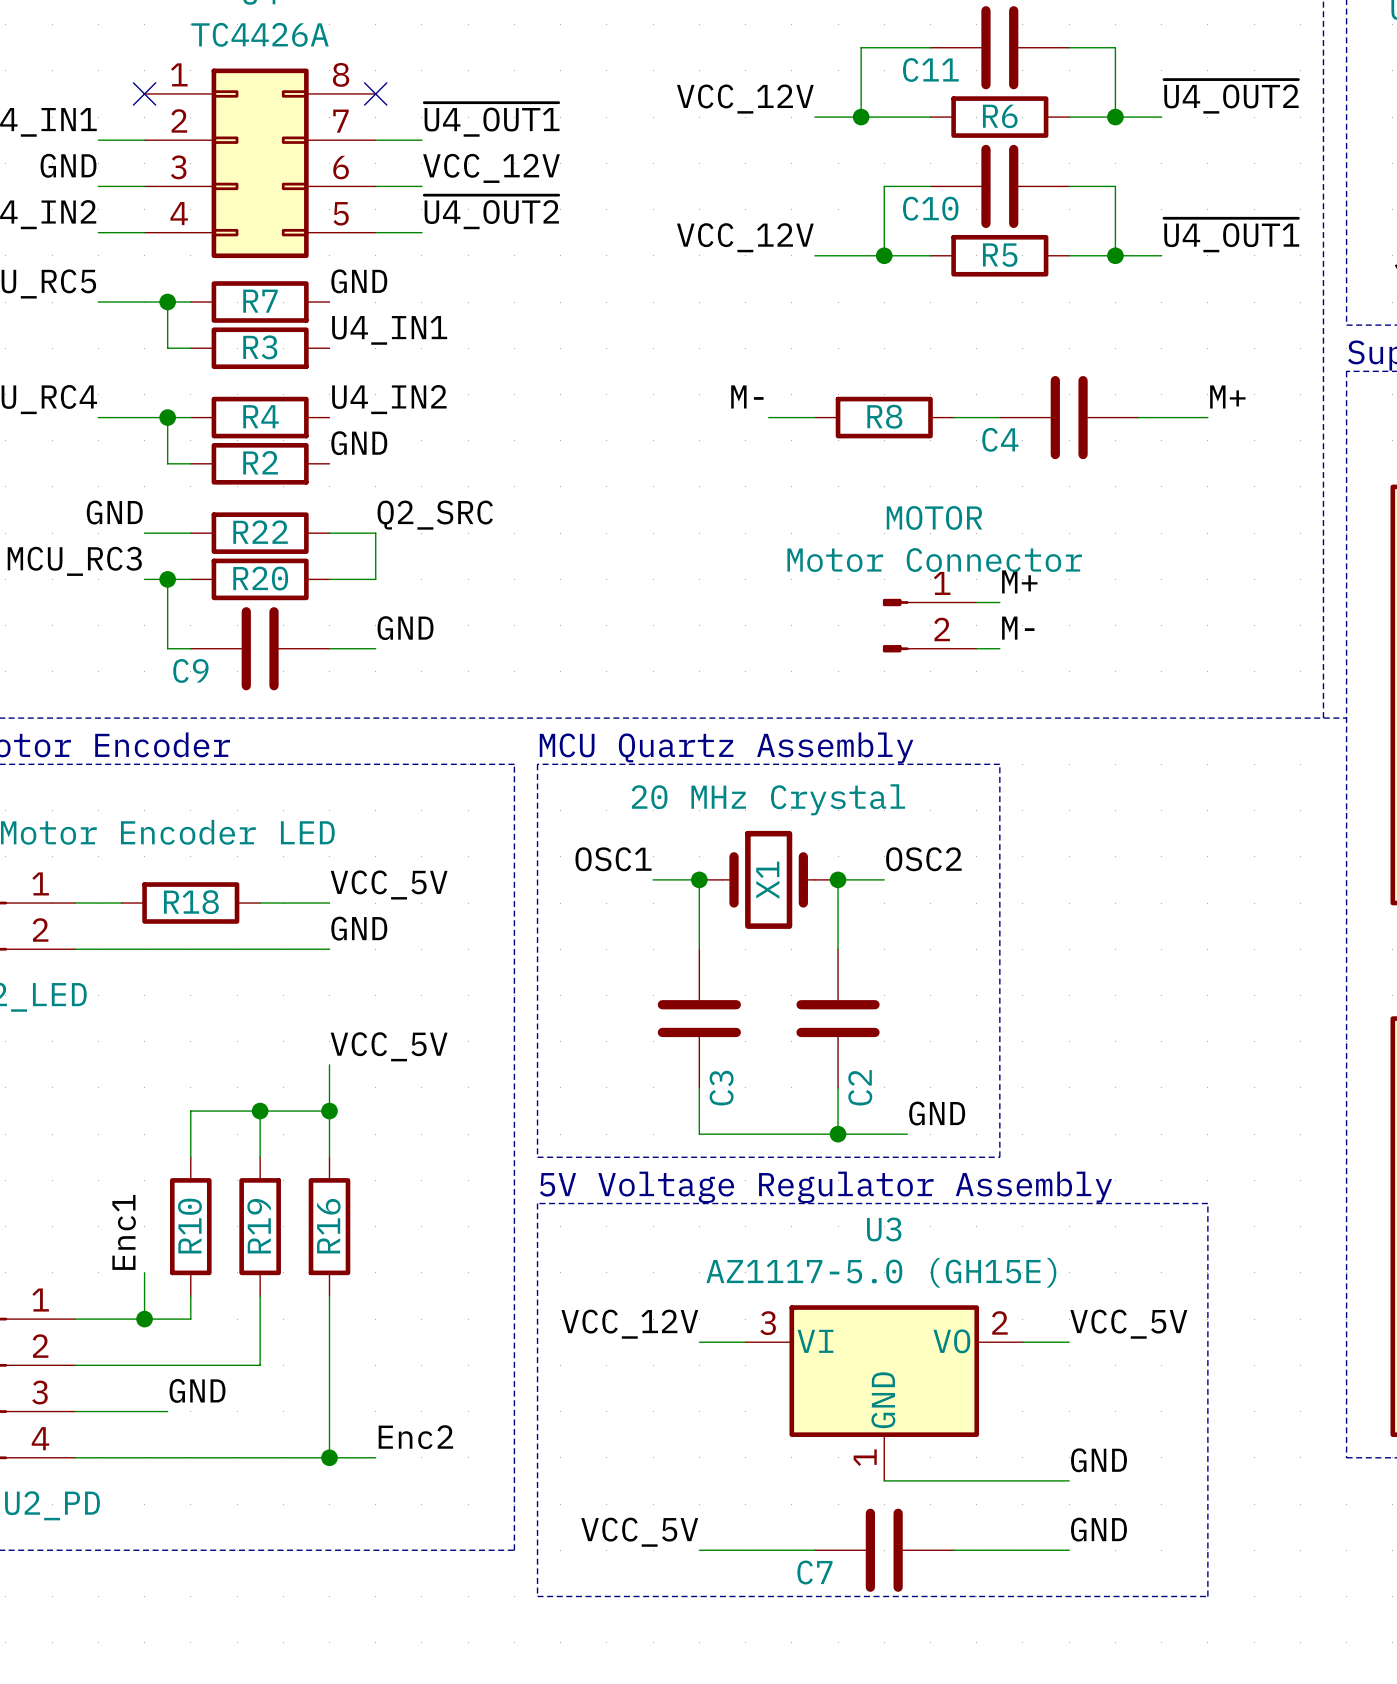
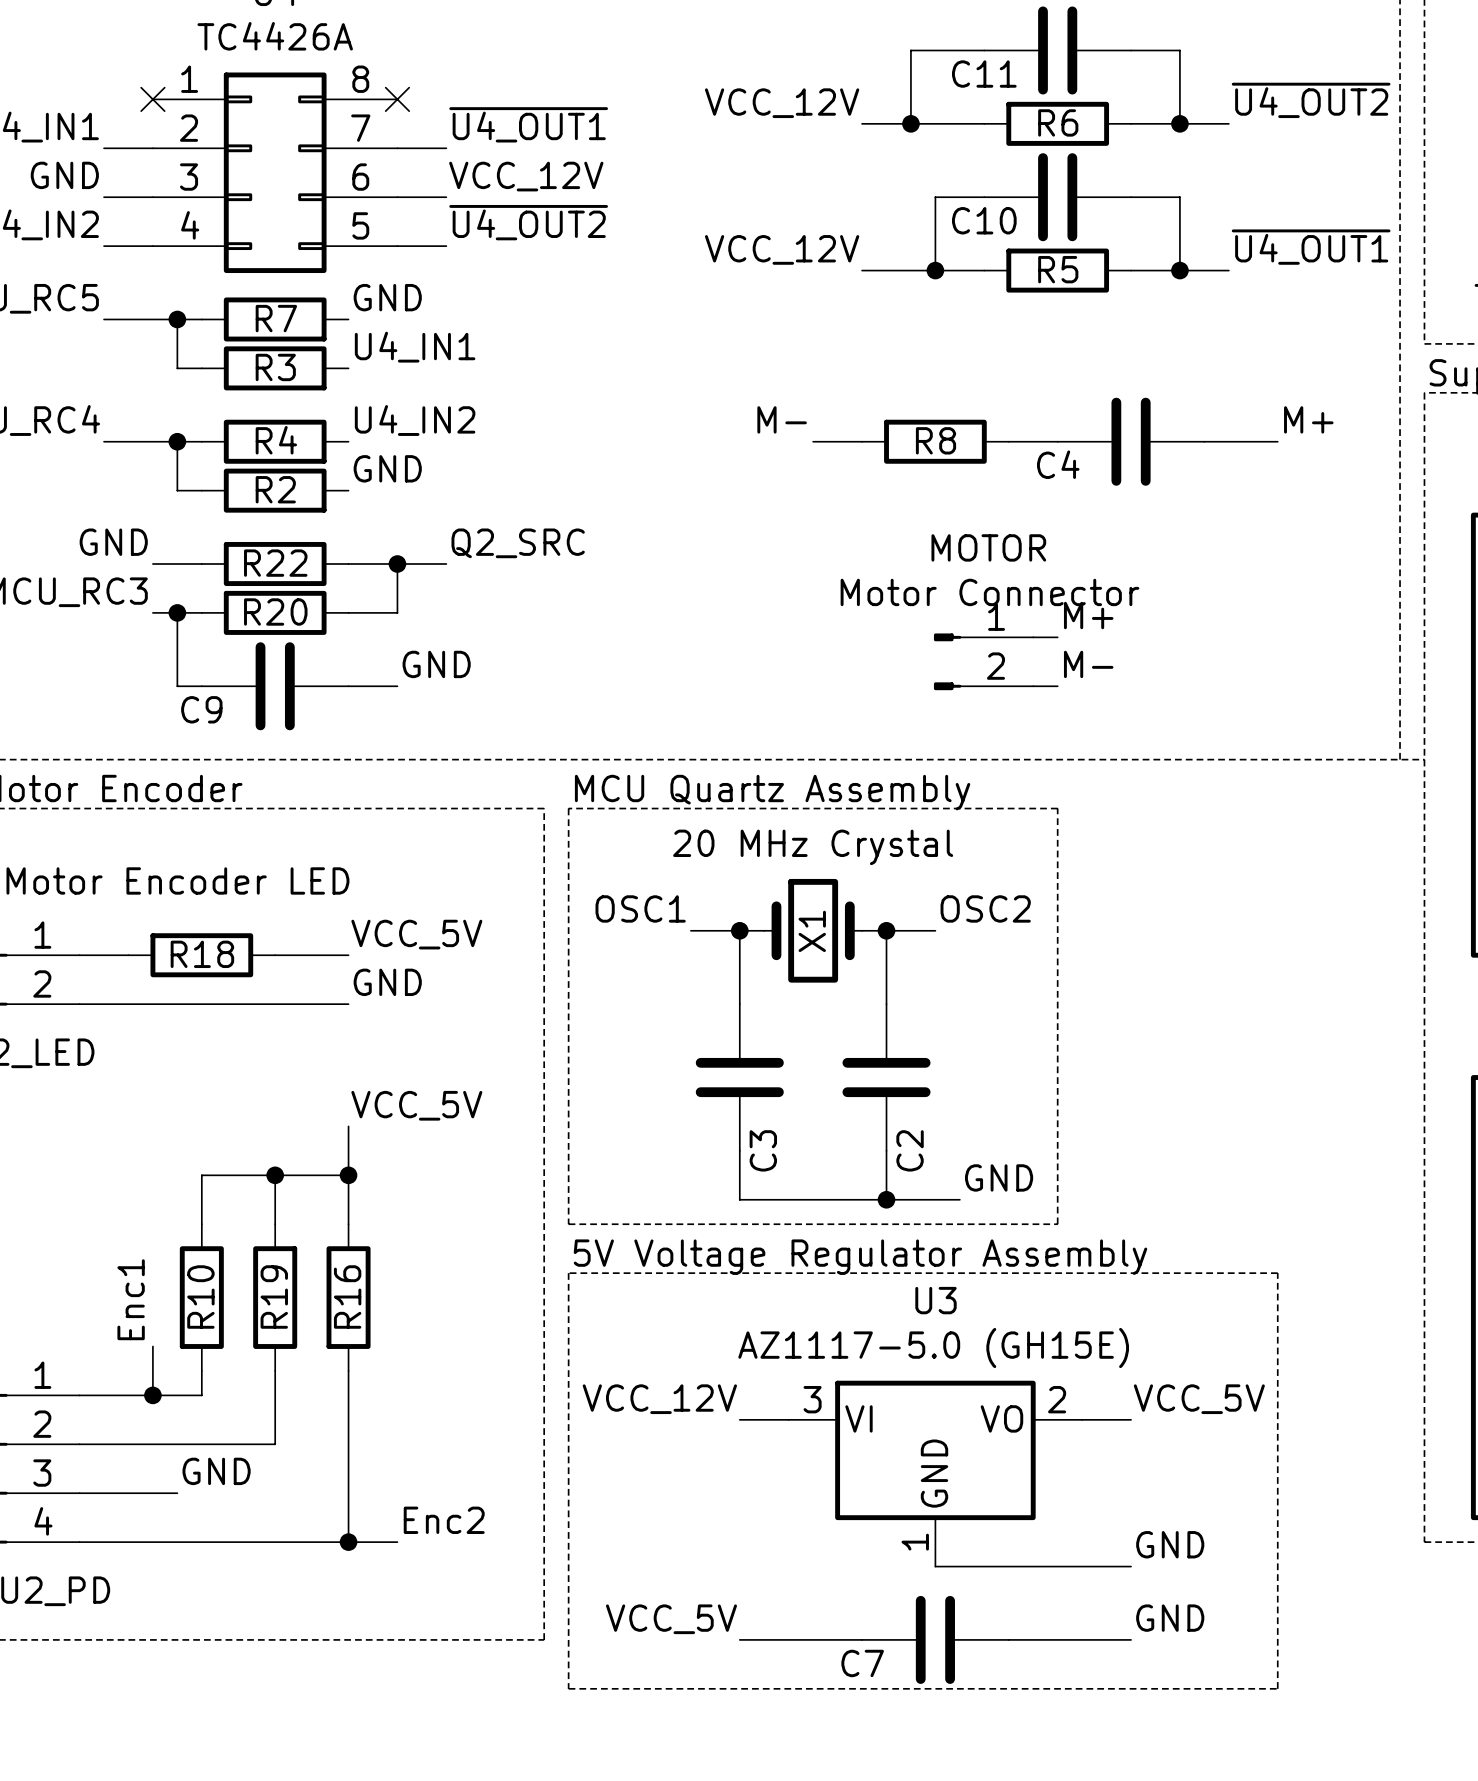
label position: Q2_SRC (435, 515) -> Q2_SRC (518, 543)
wire: none -> (397, 564) (446, 564)
junction: none -> (397, 564)

